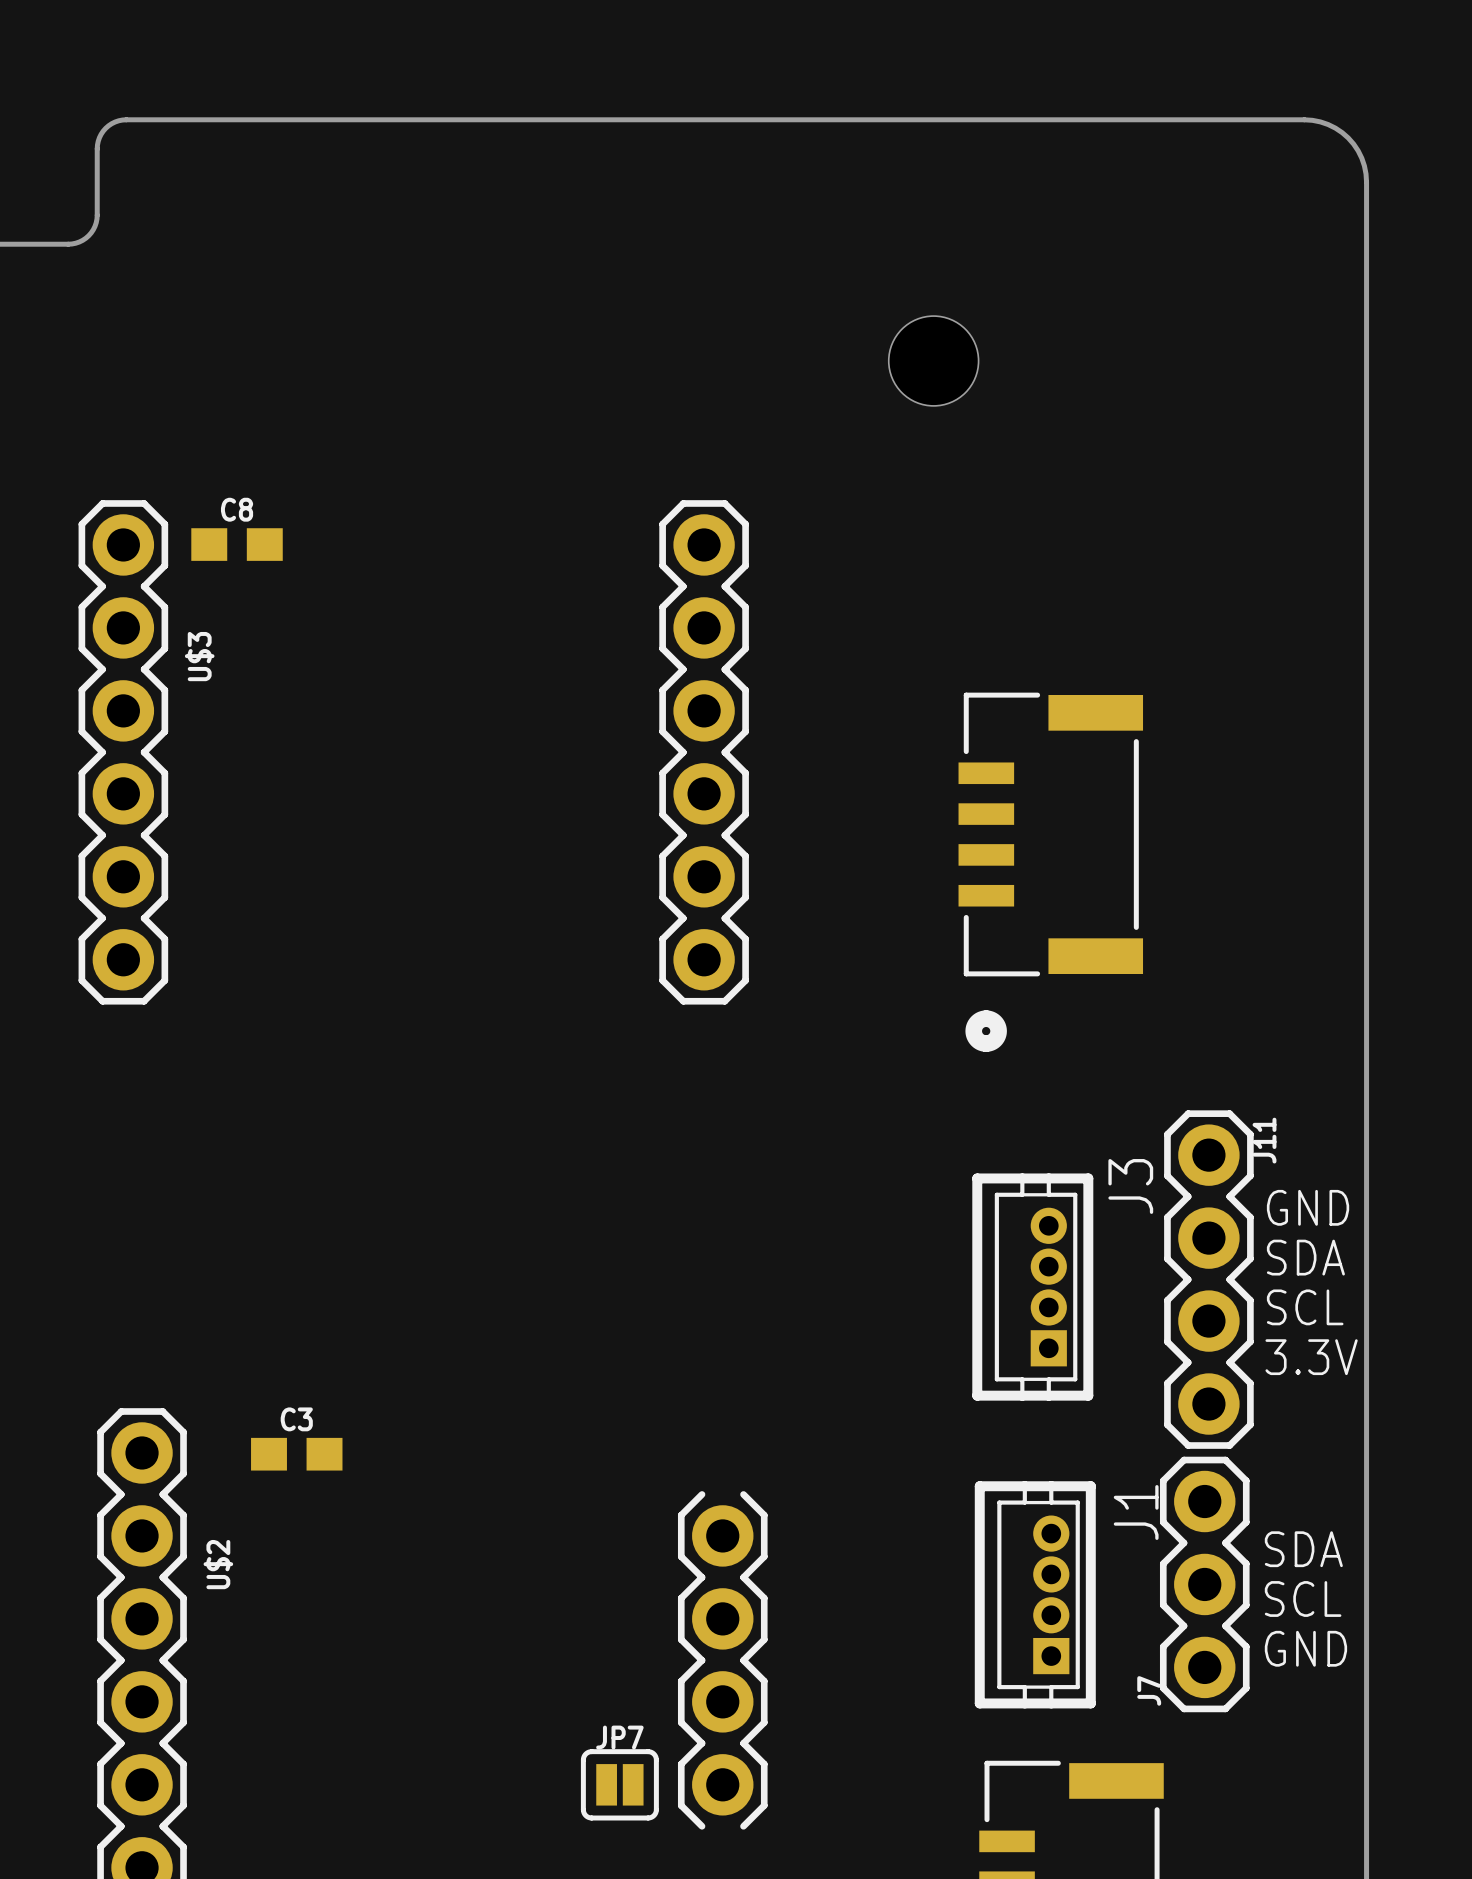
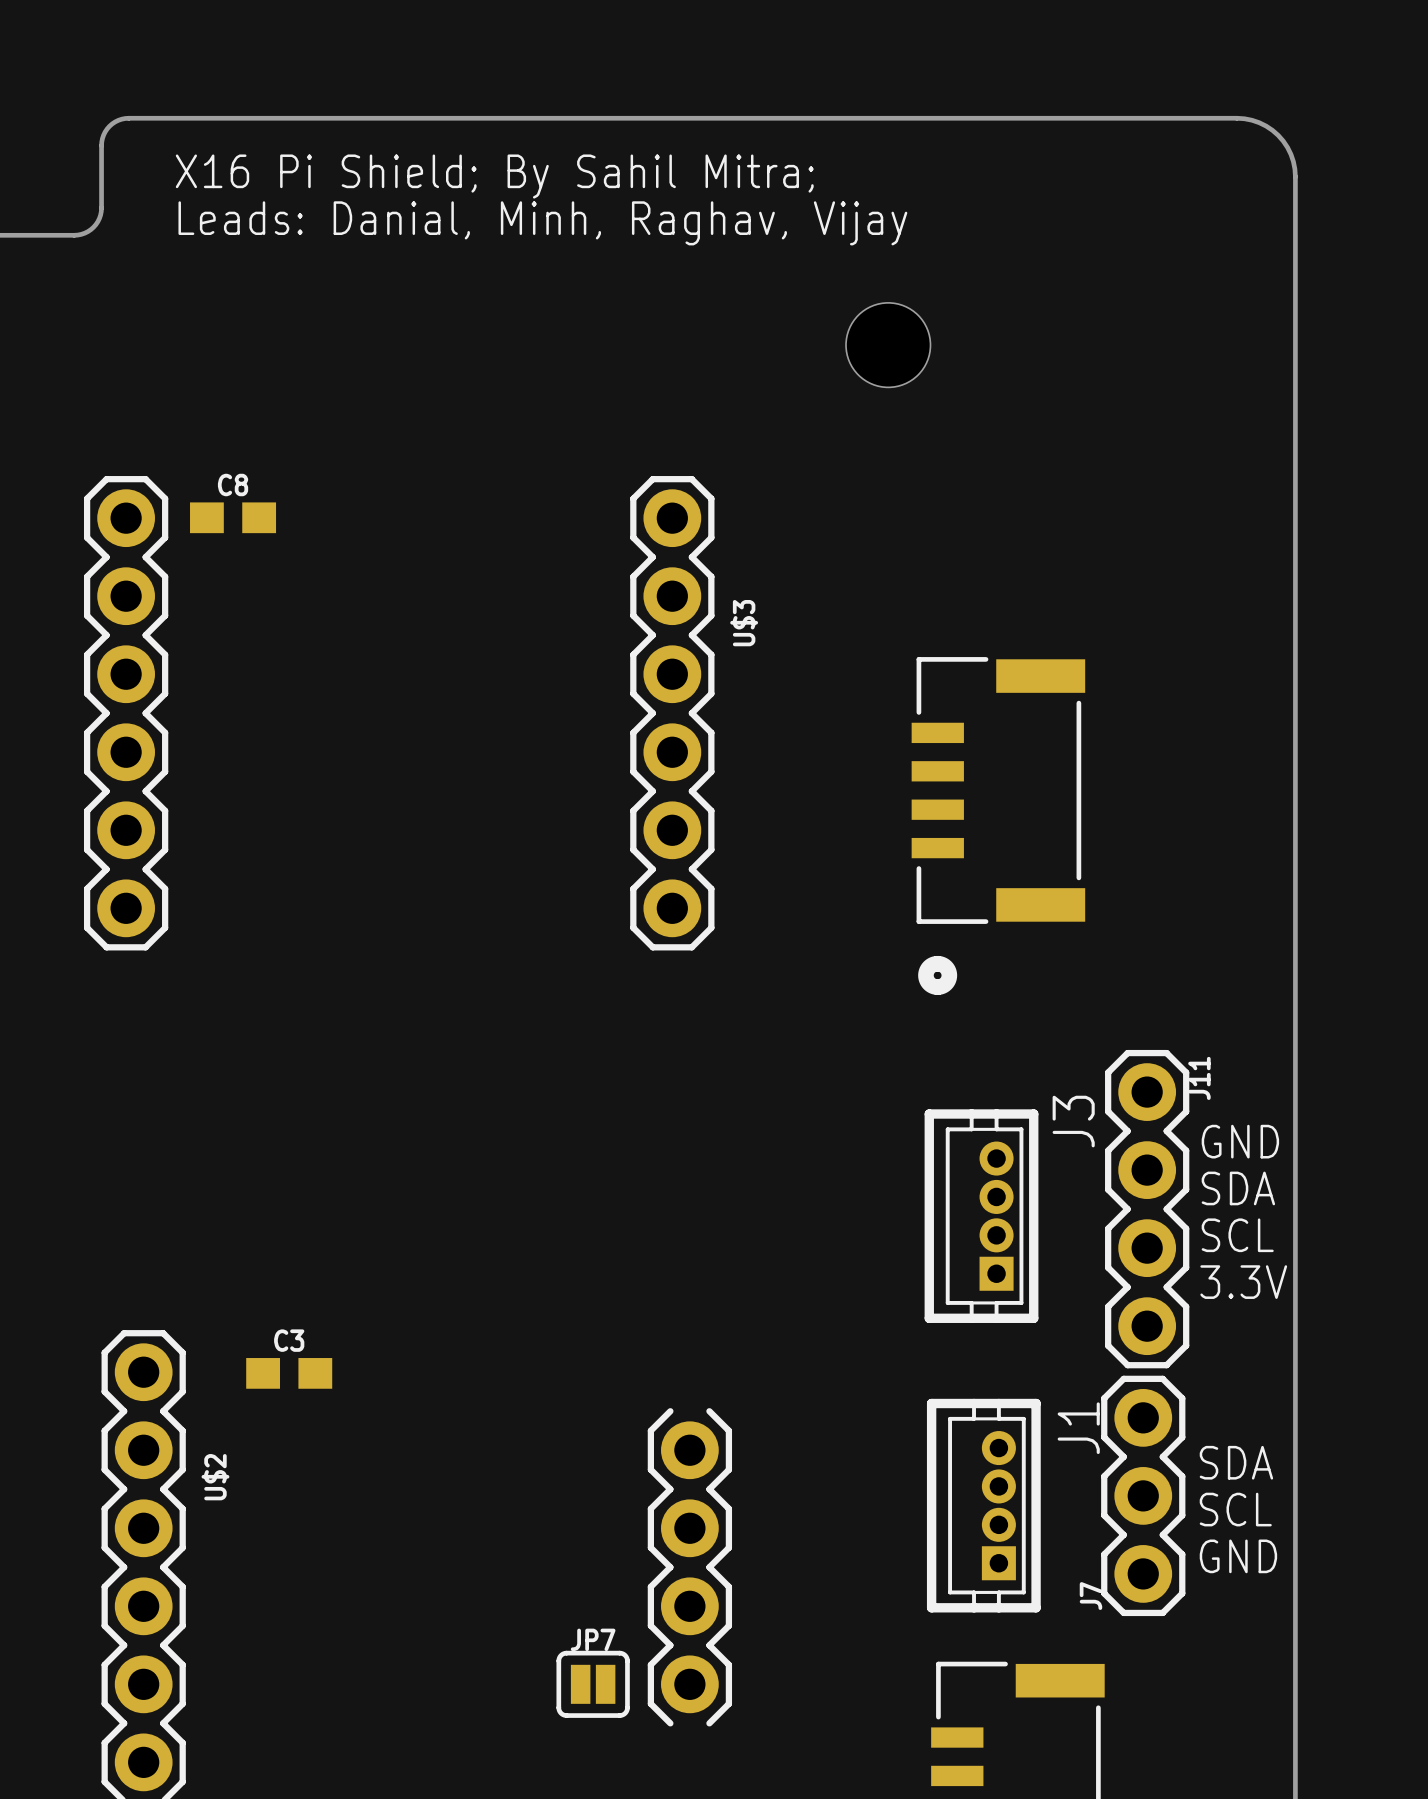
text: none -> X16 Pi Shield; By Sahil Mitra; (494, 176)
text: none -> Leads: Danial, Minh, Raghav, Vijay (542, 223)
U$3 name position: U$3 (199, 656) -> U$3 (744, 623)

